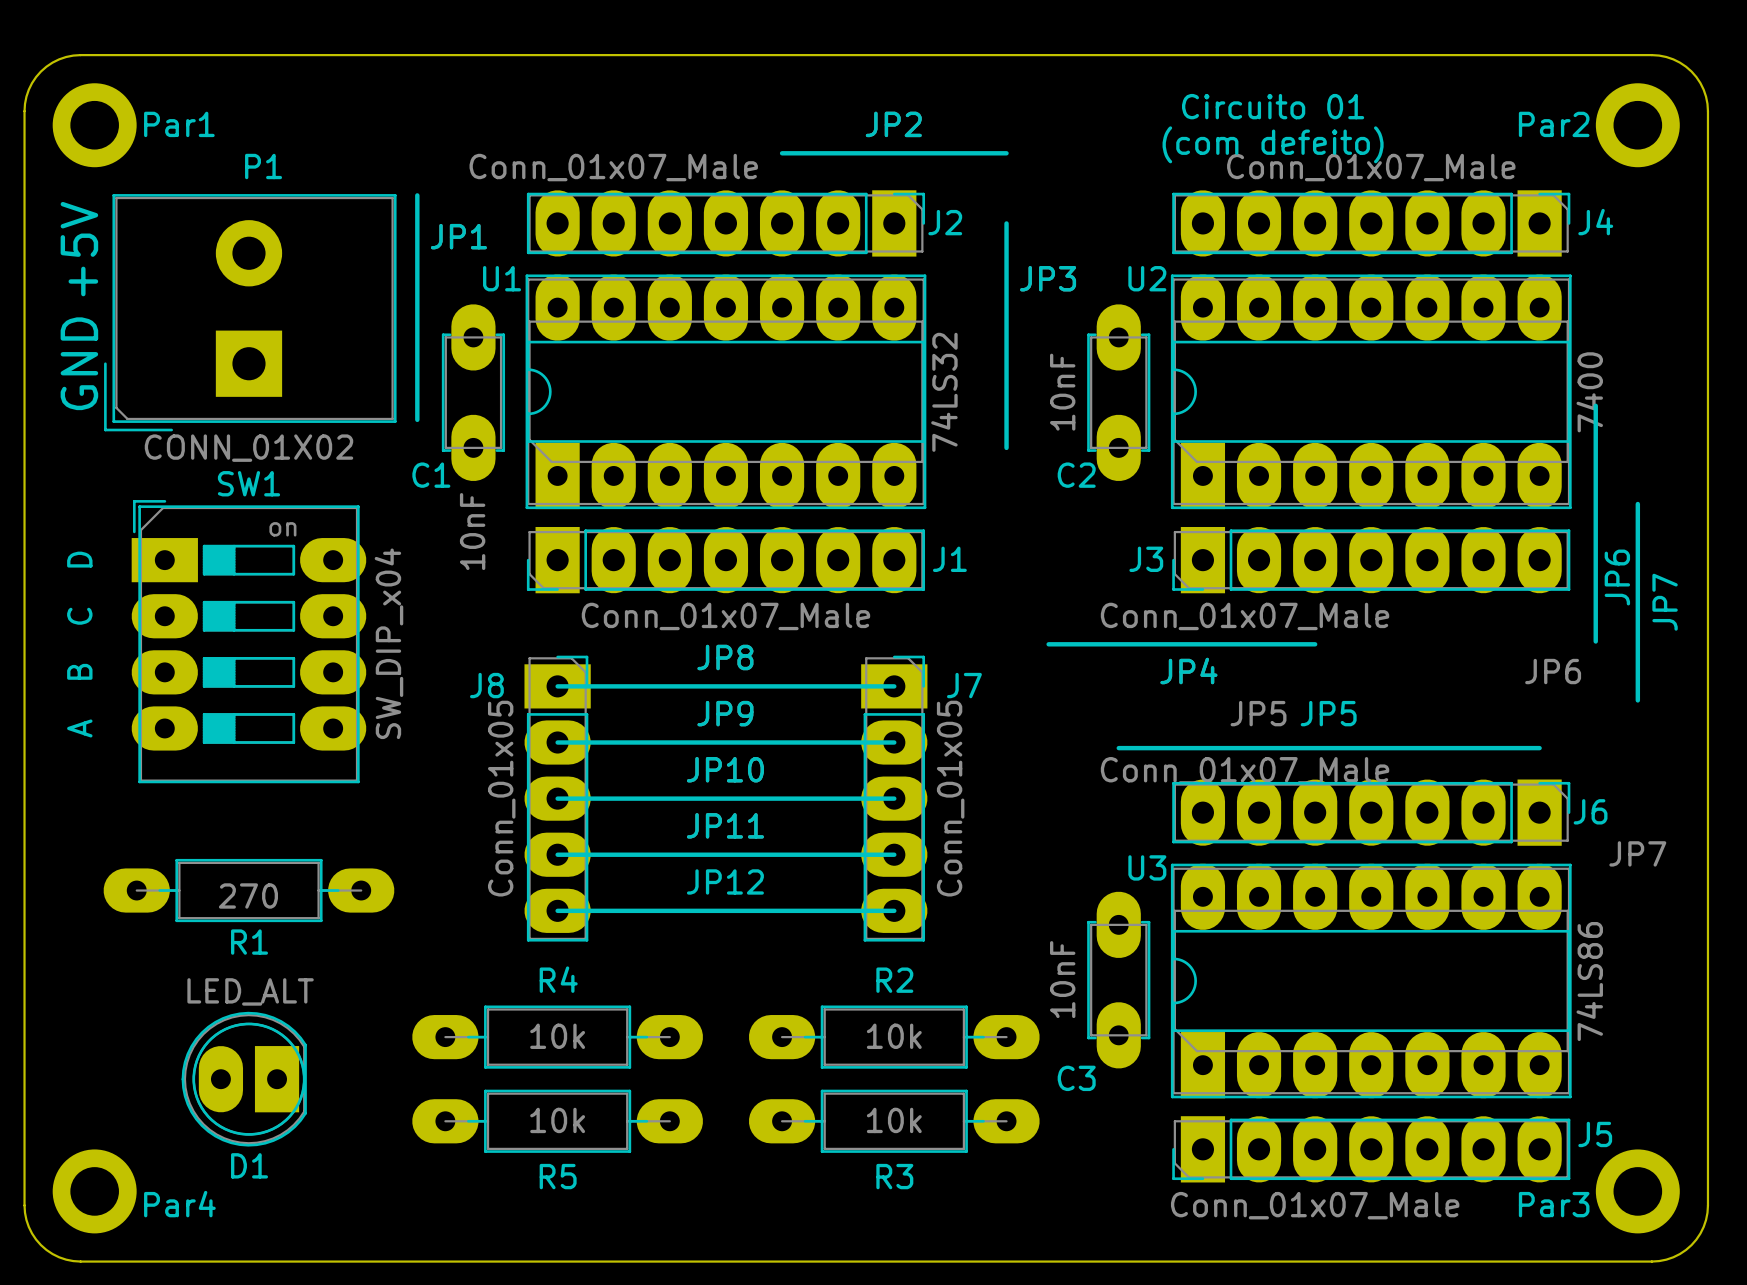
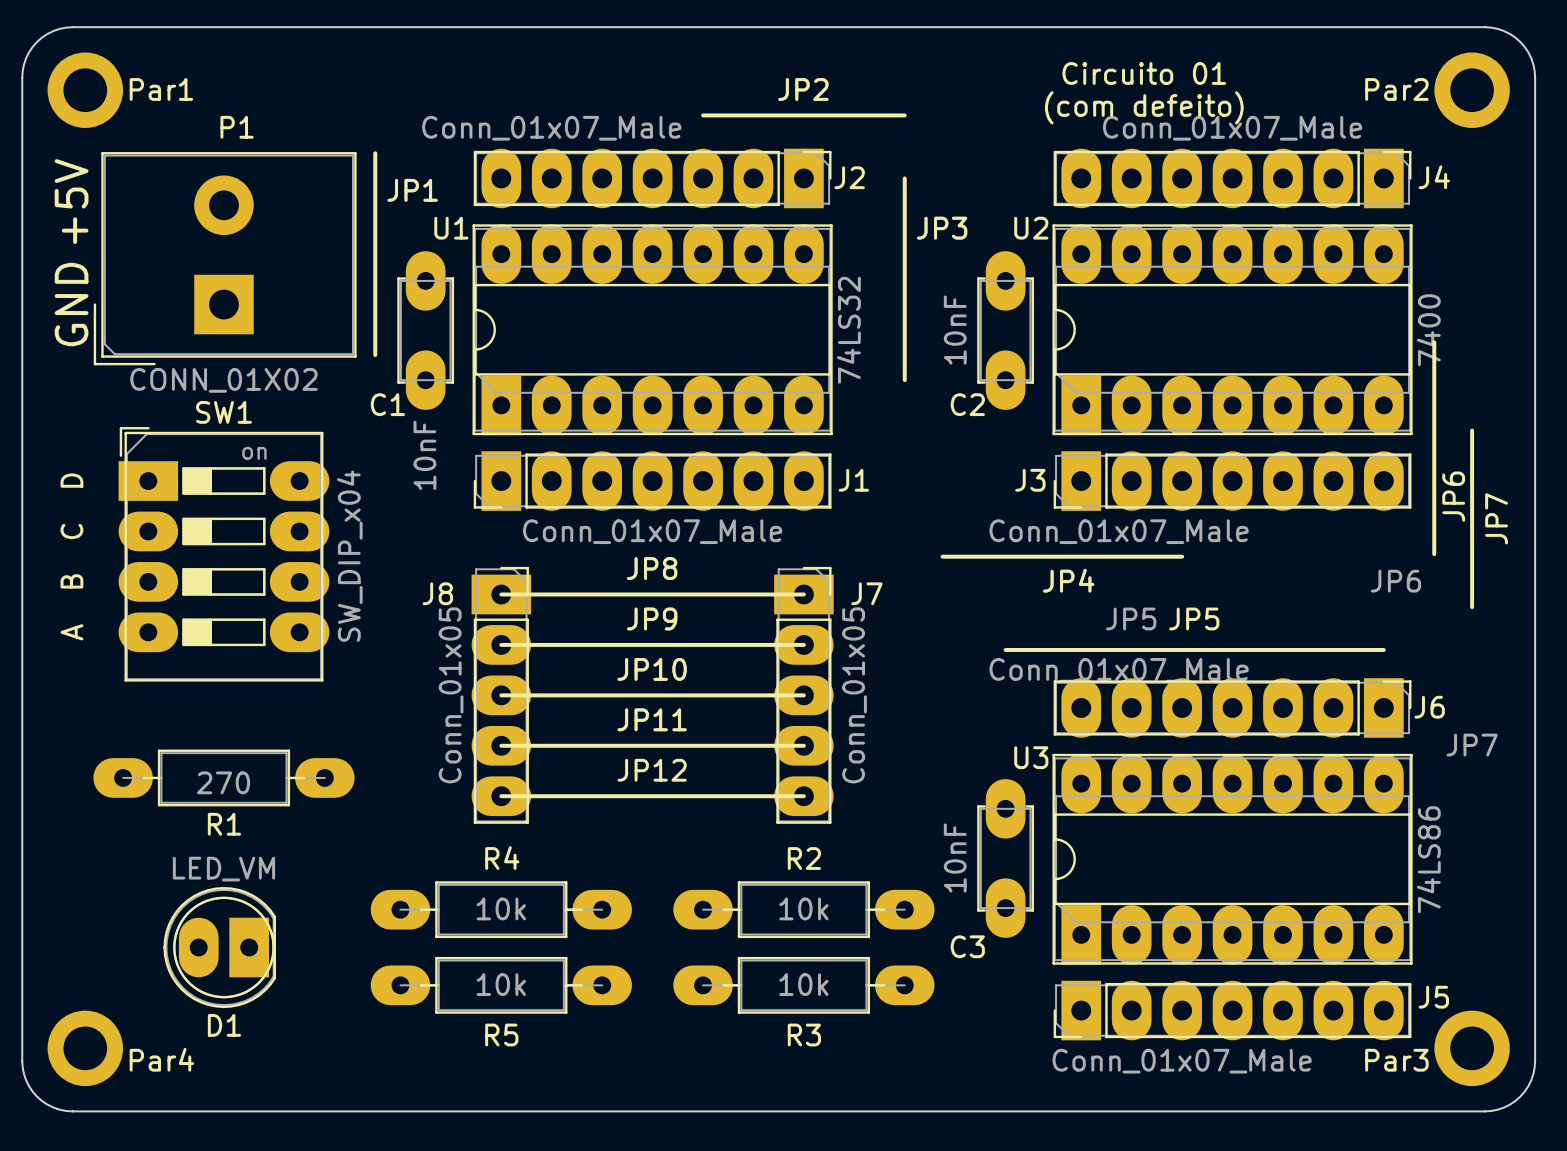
D1 value: LED_ALT (250, 991) -> LED_VM (223, 869)

